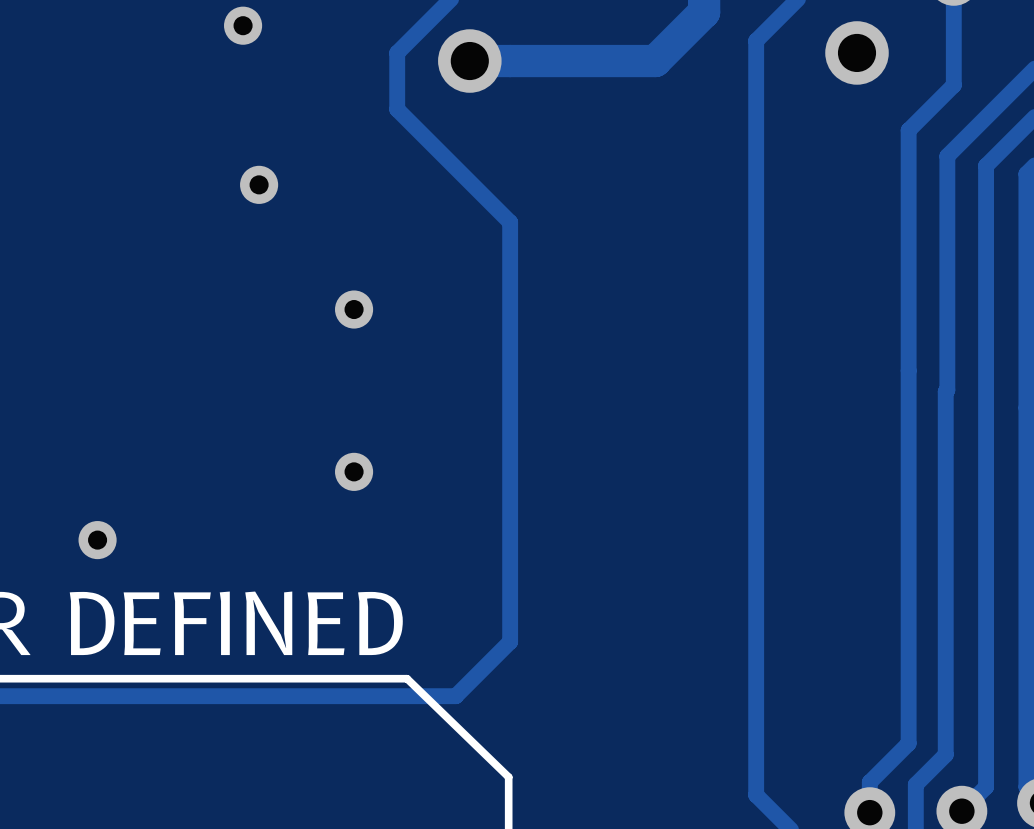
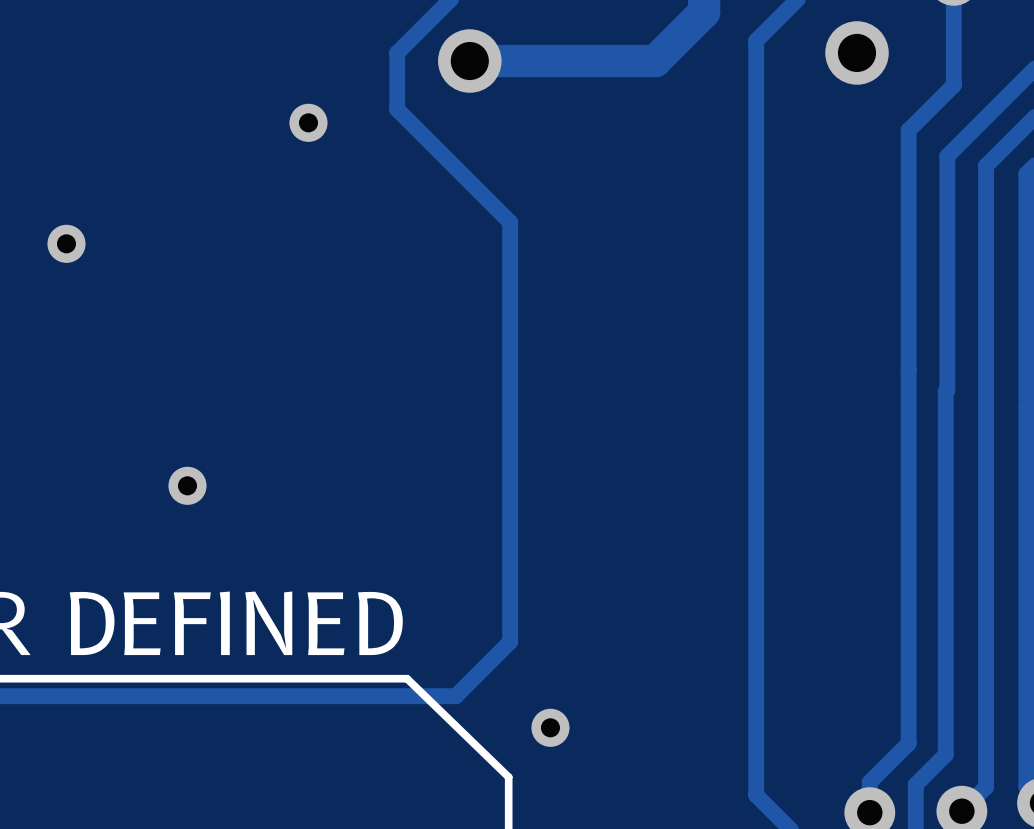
via: (243, 25) -> none
via: none -> (308, 122)
via: (259, 184) -> none
via: none -> (66, 243)
via: (354, 309) -> none
via: (354, 471) -> none
via: none -> (187, 485)
via: (97, 540) -> none
via: none -> (550, 727)

